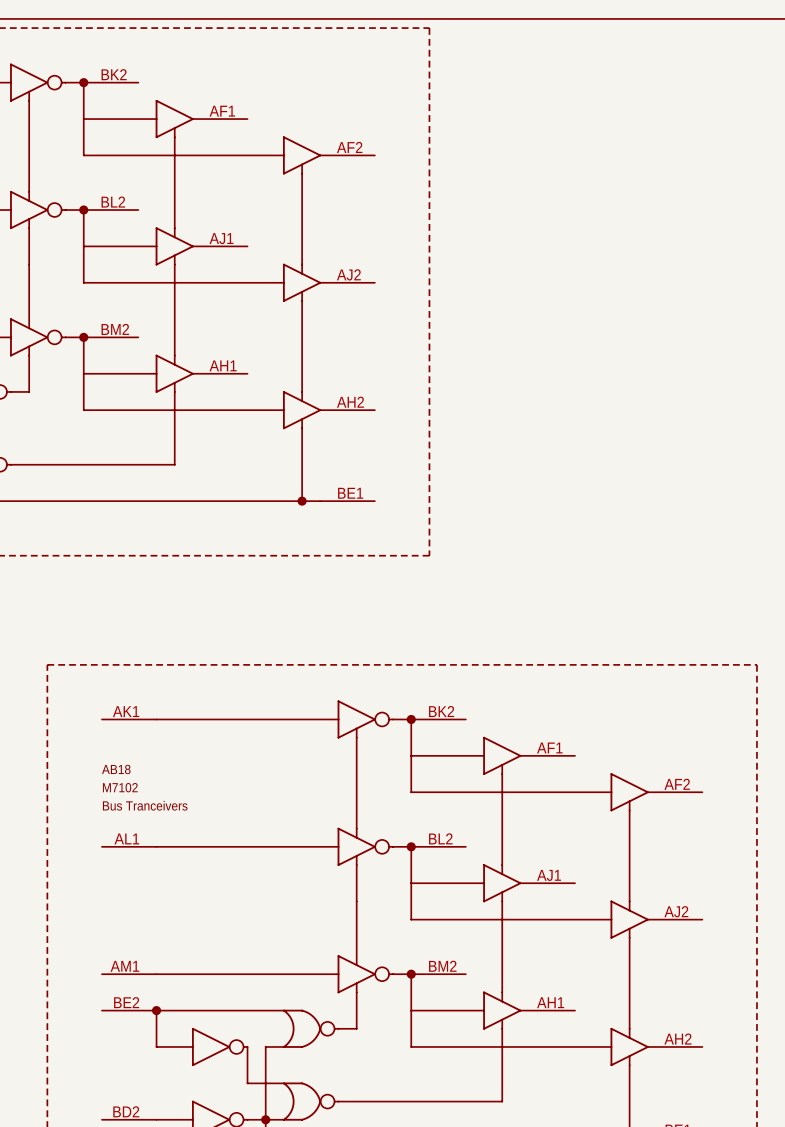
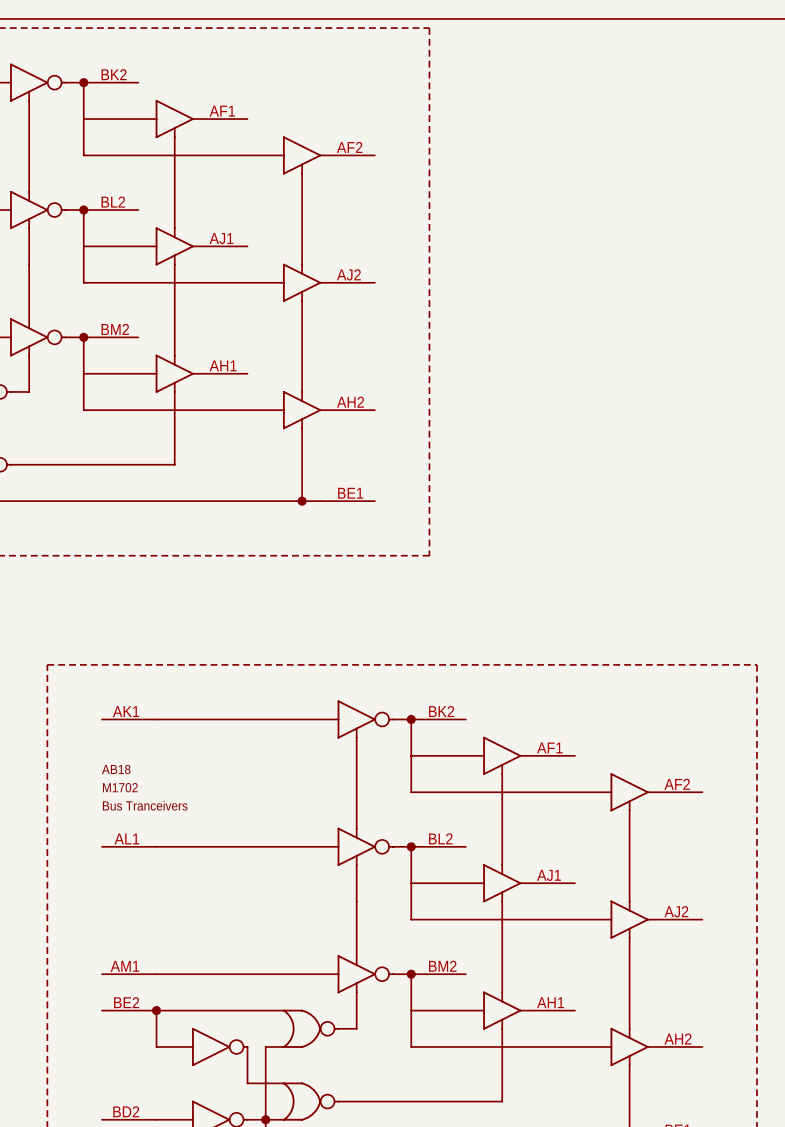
AB18 value: M7102 (120, 787) -> M1702 (120, 787)

